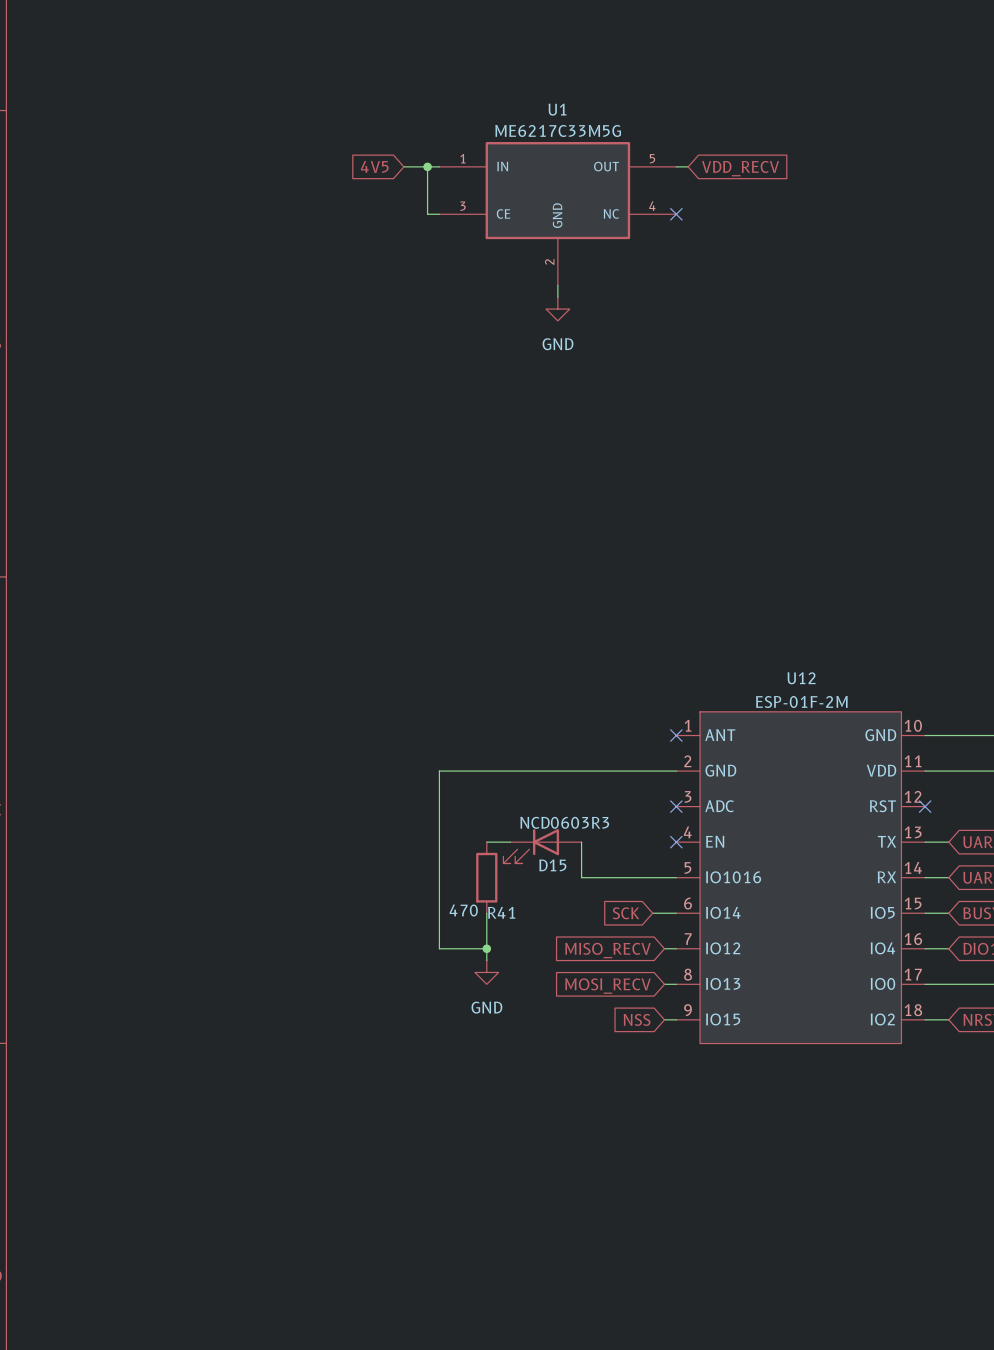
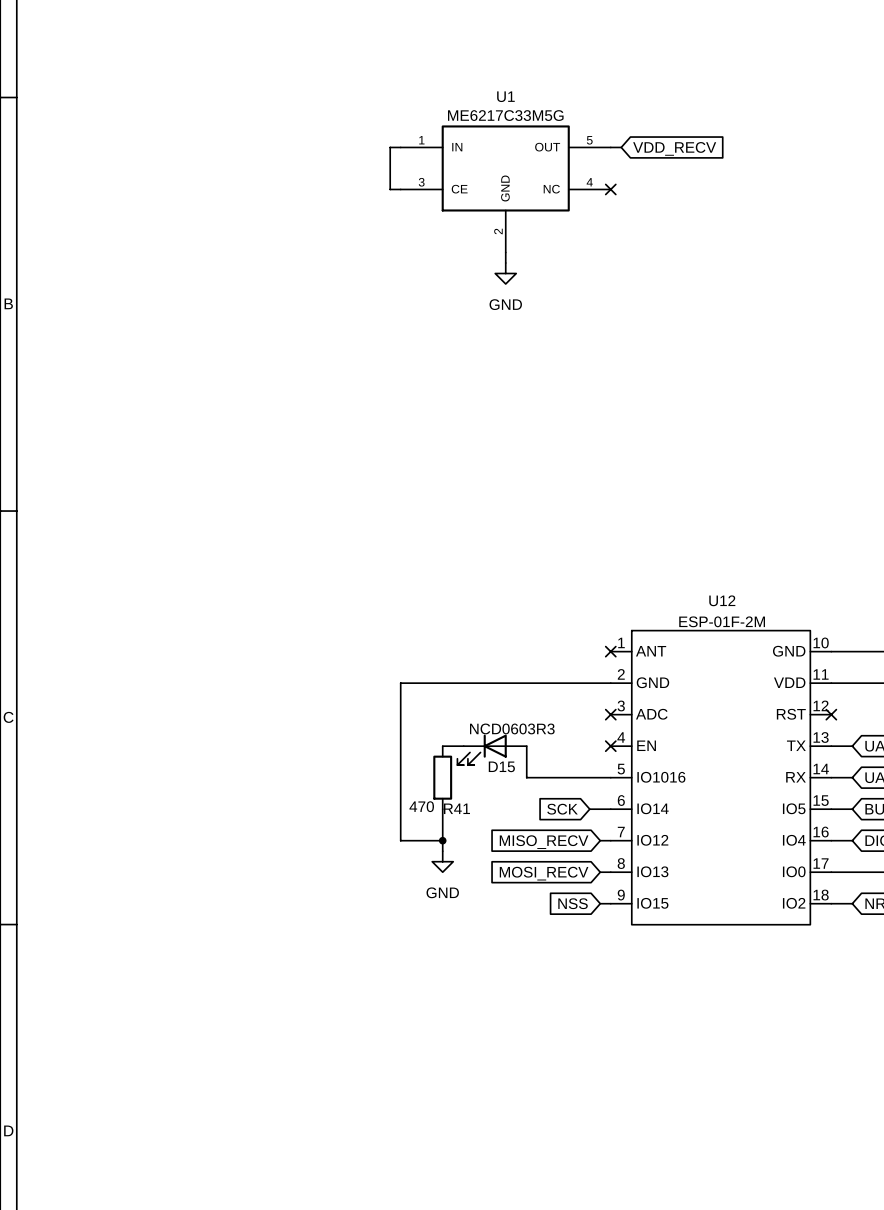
global label: 4V5 (374, 166) -> none
wire: (403, 166) (427, 166) -> none
junction: (427, 166) -> none

